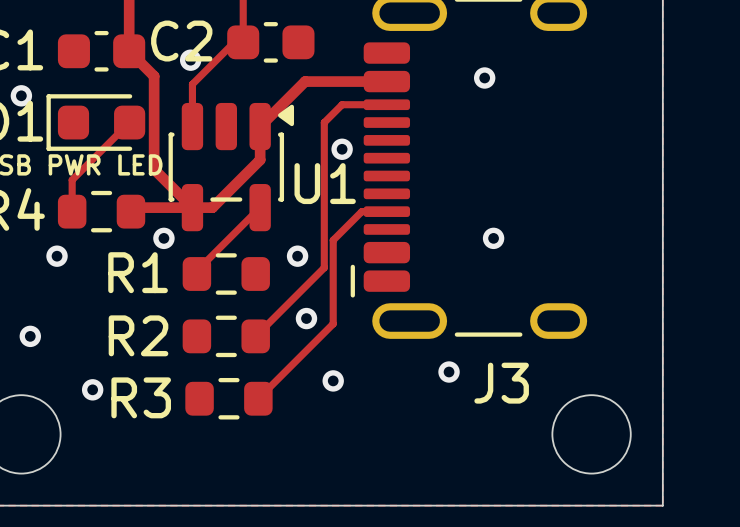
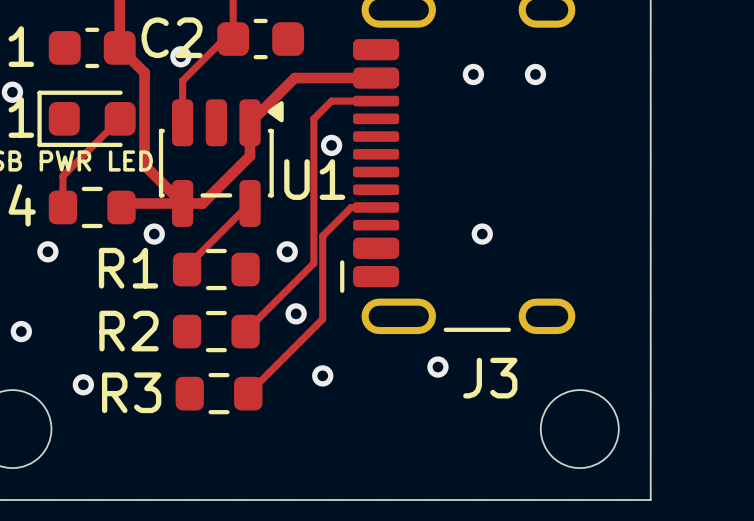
via: none -> (535, 74)

